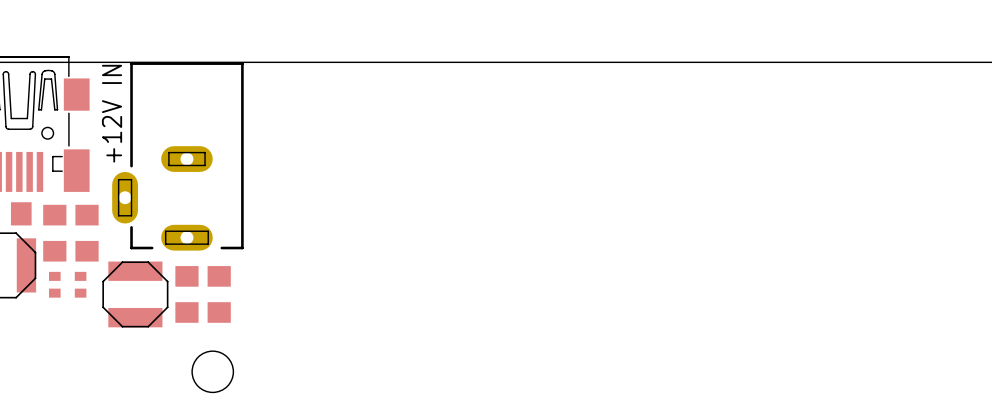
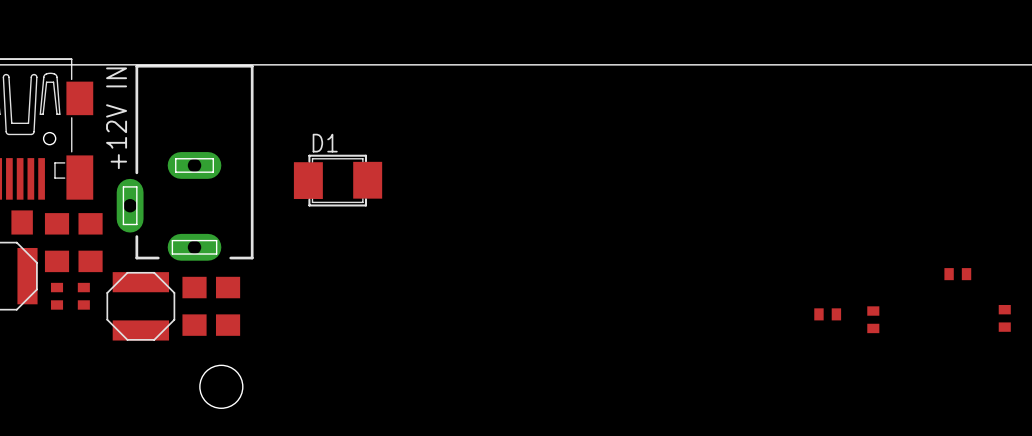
D1: none -> (338, 180)
part: none -> (957, 274)
part: none -> (827, 314)
part: none -> (1004, 318)
part: none -> (873, 319)

